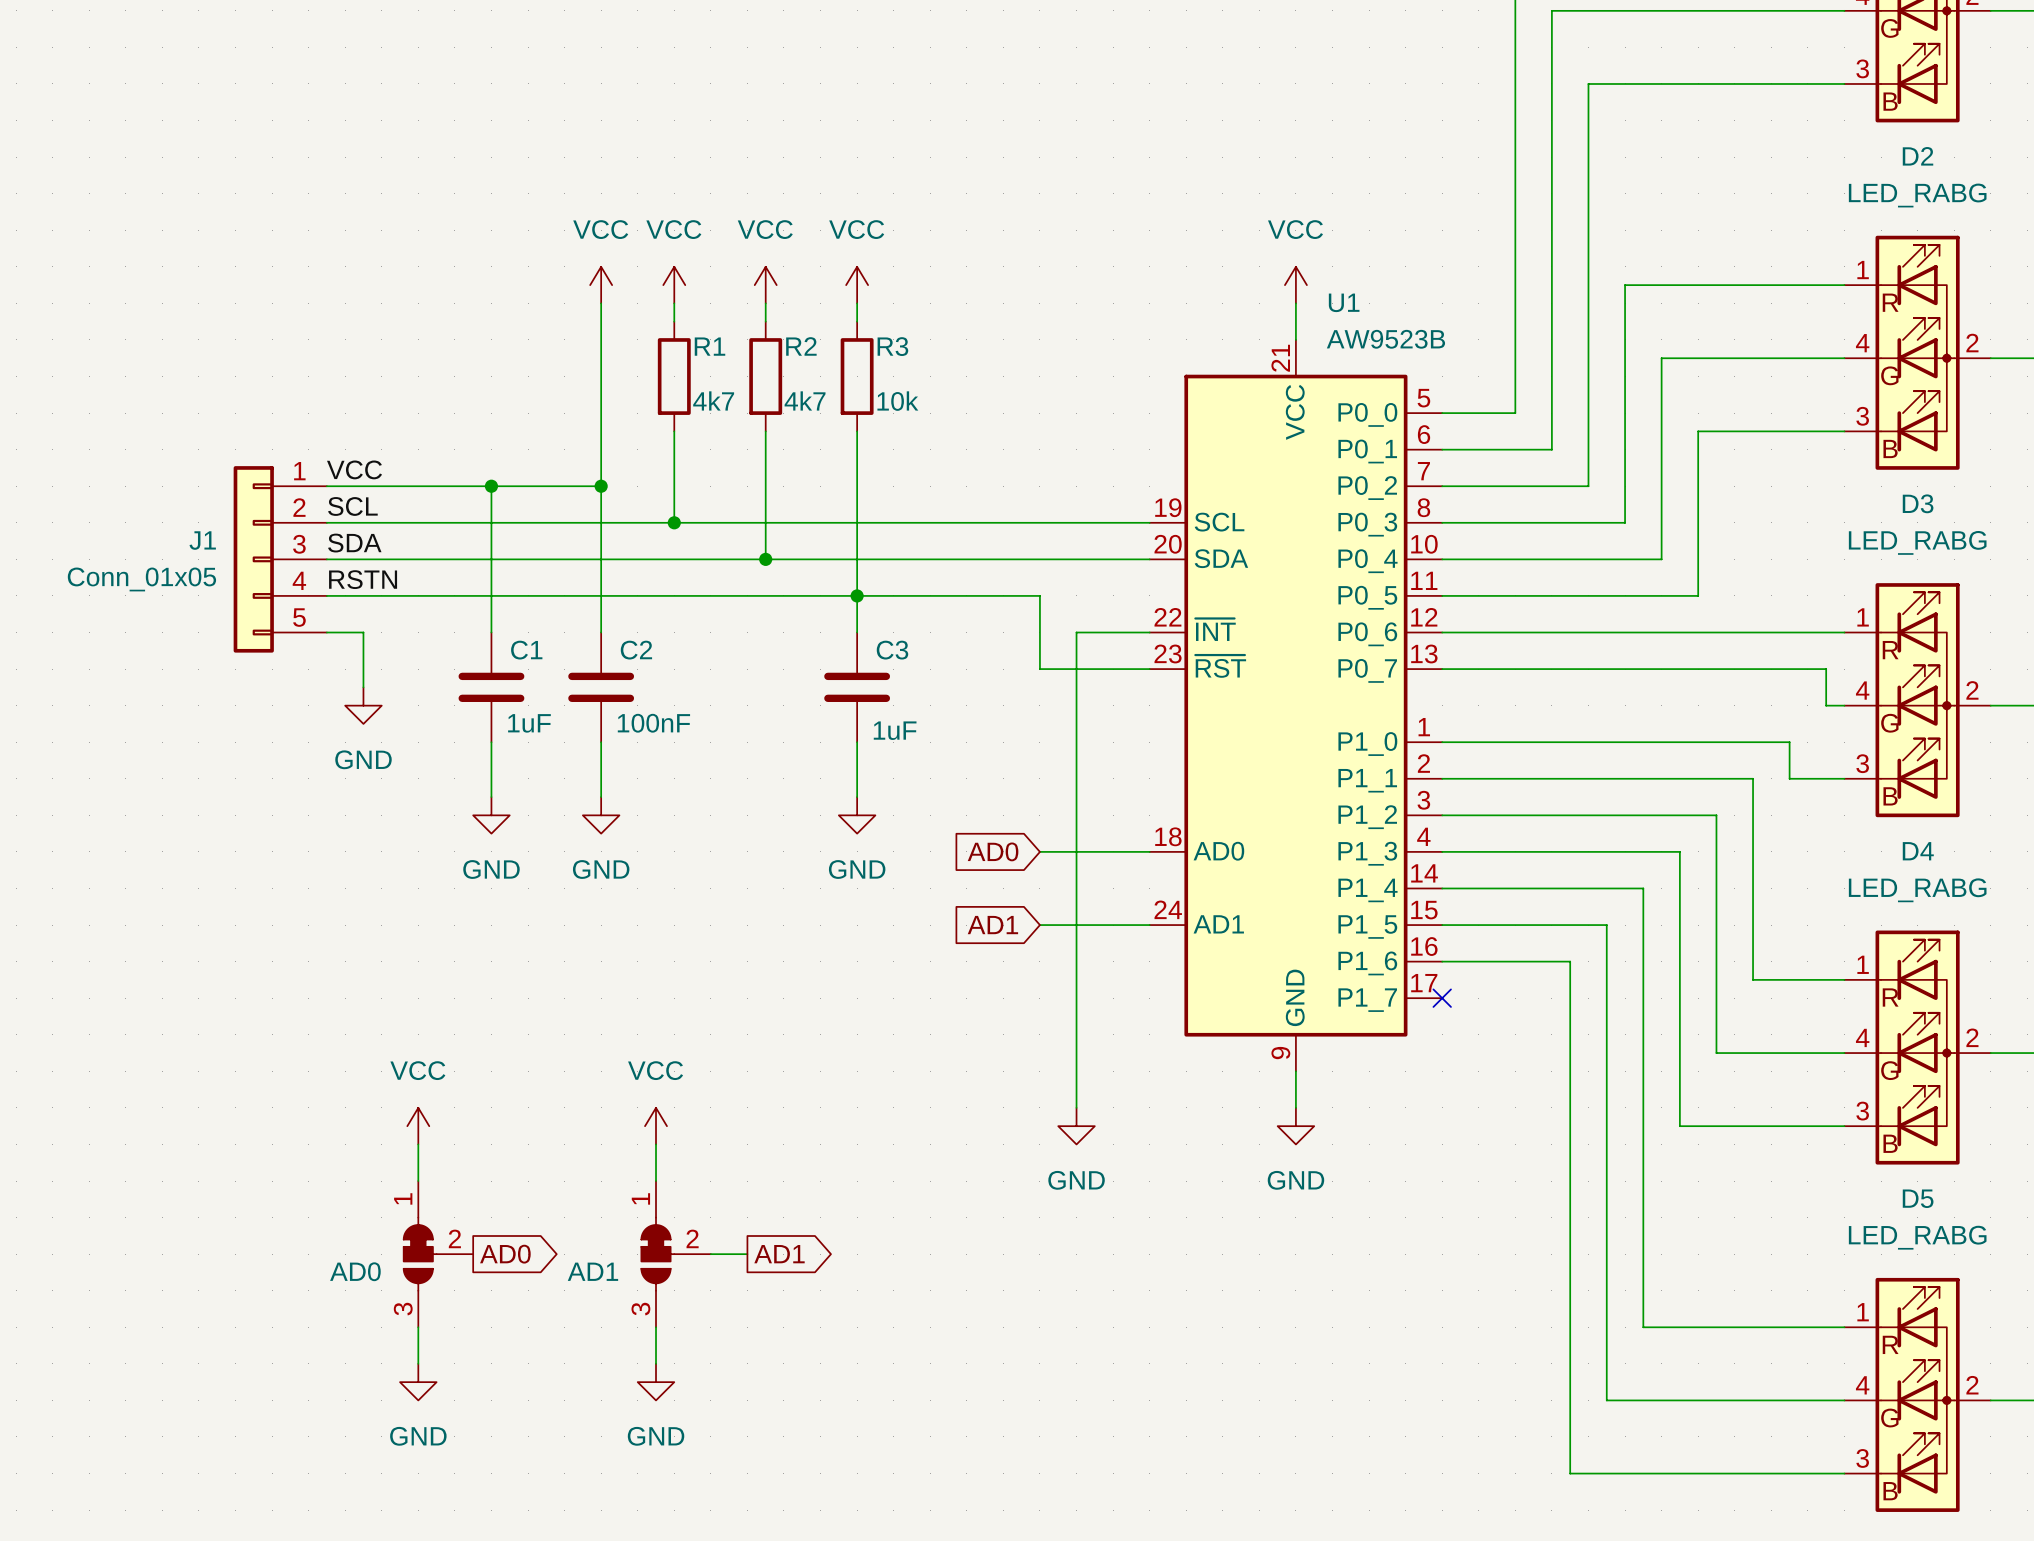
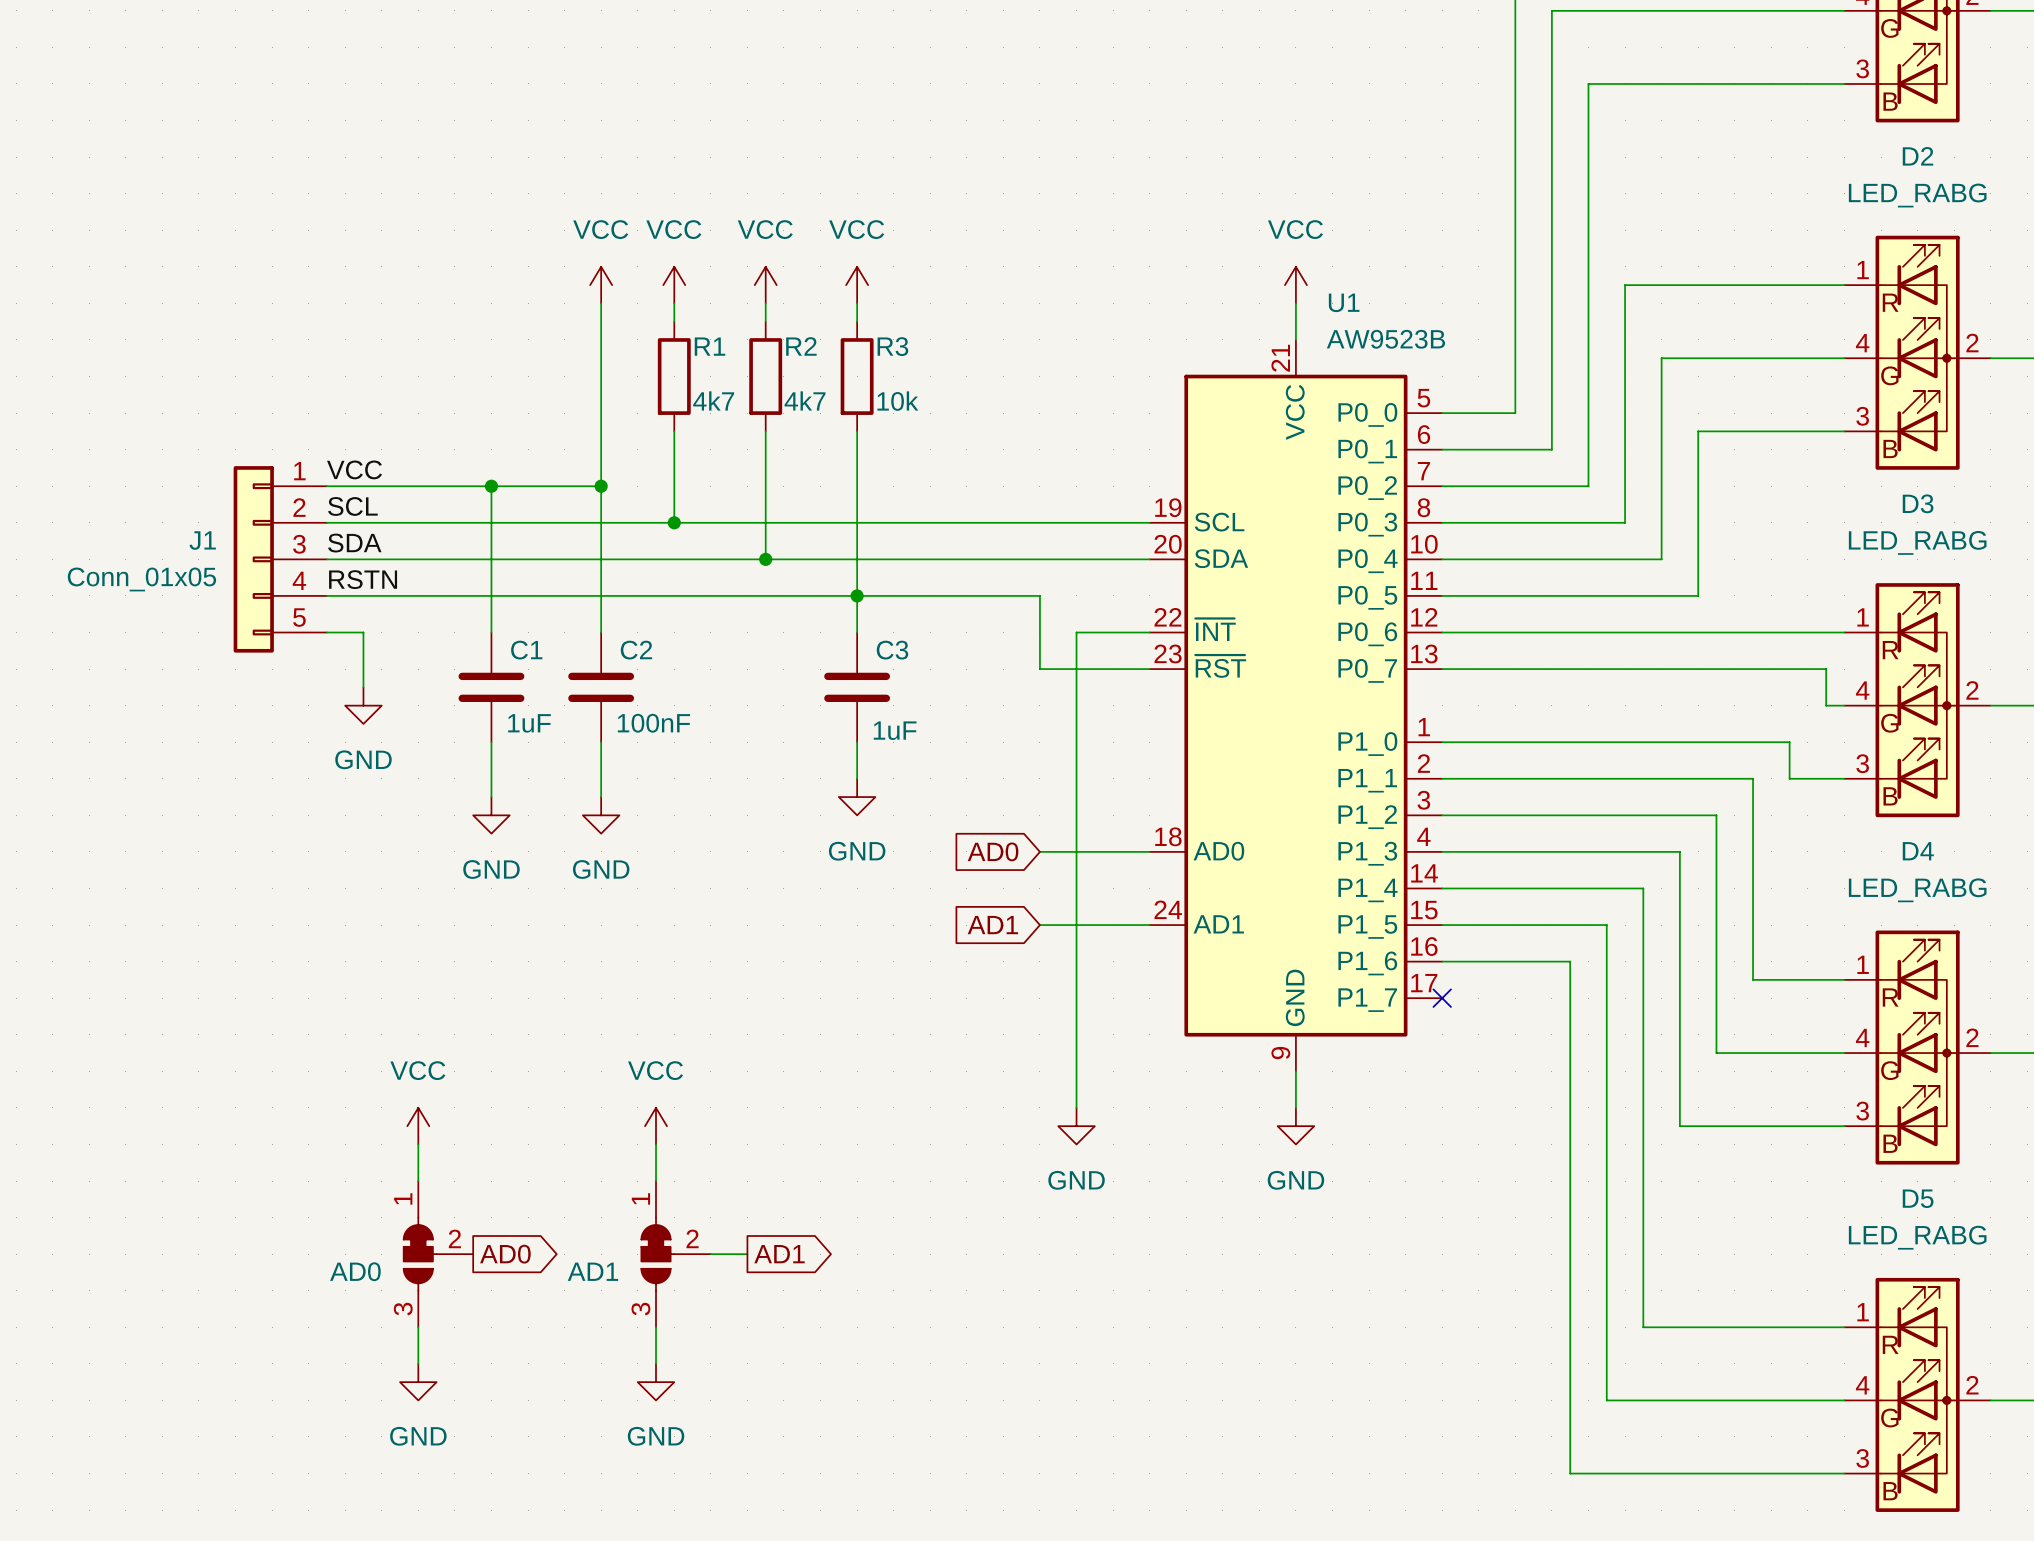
power symbol position: GND (857, 815) -> GND (857, 797)

